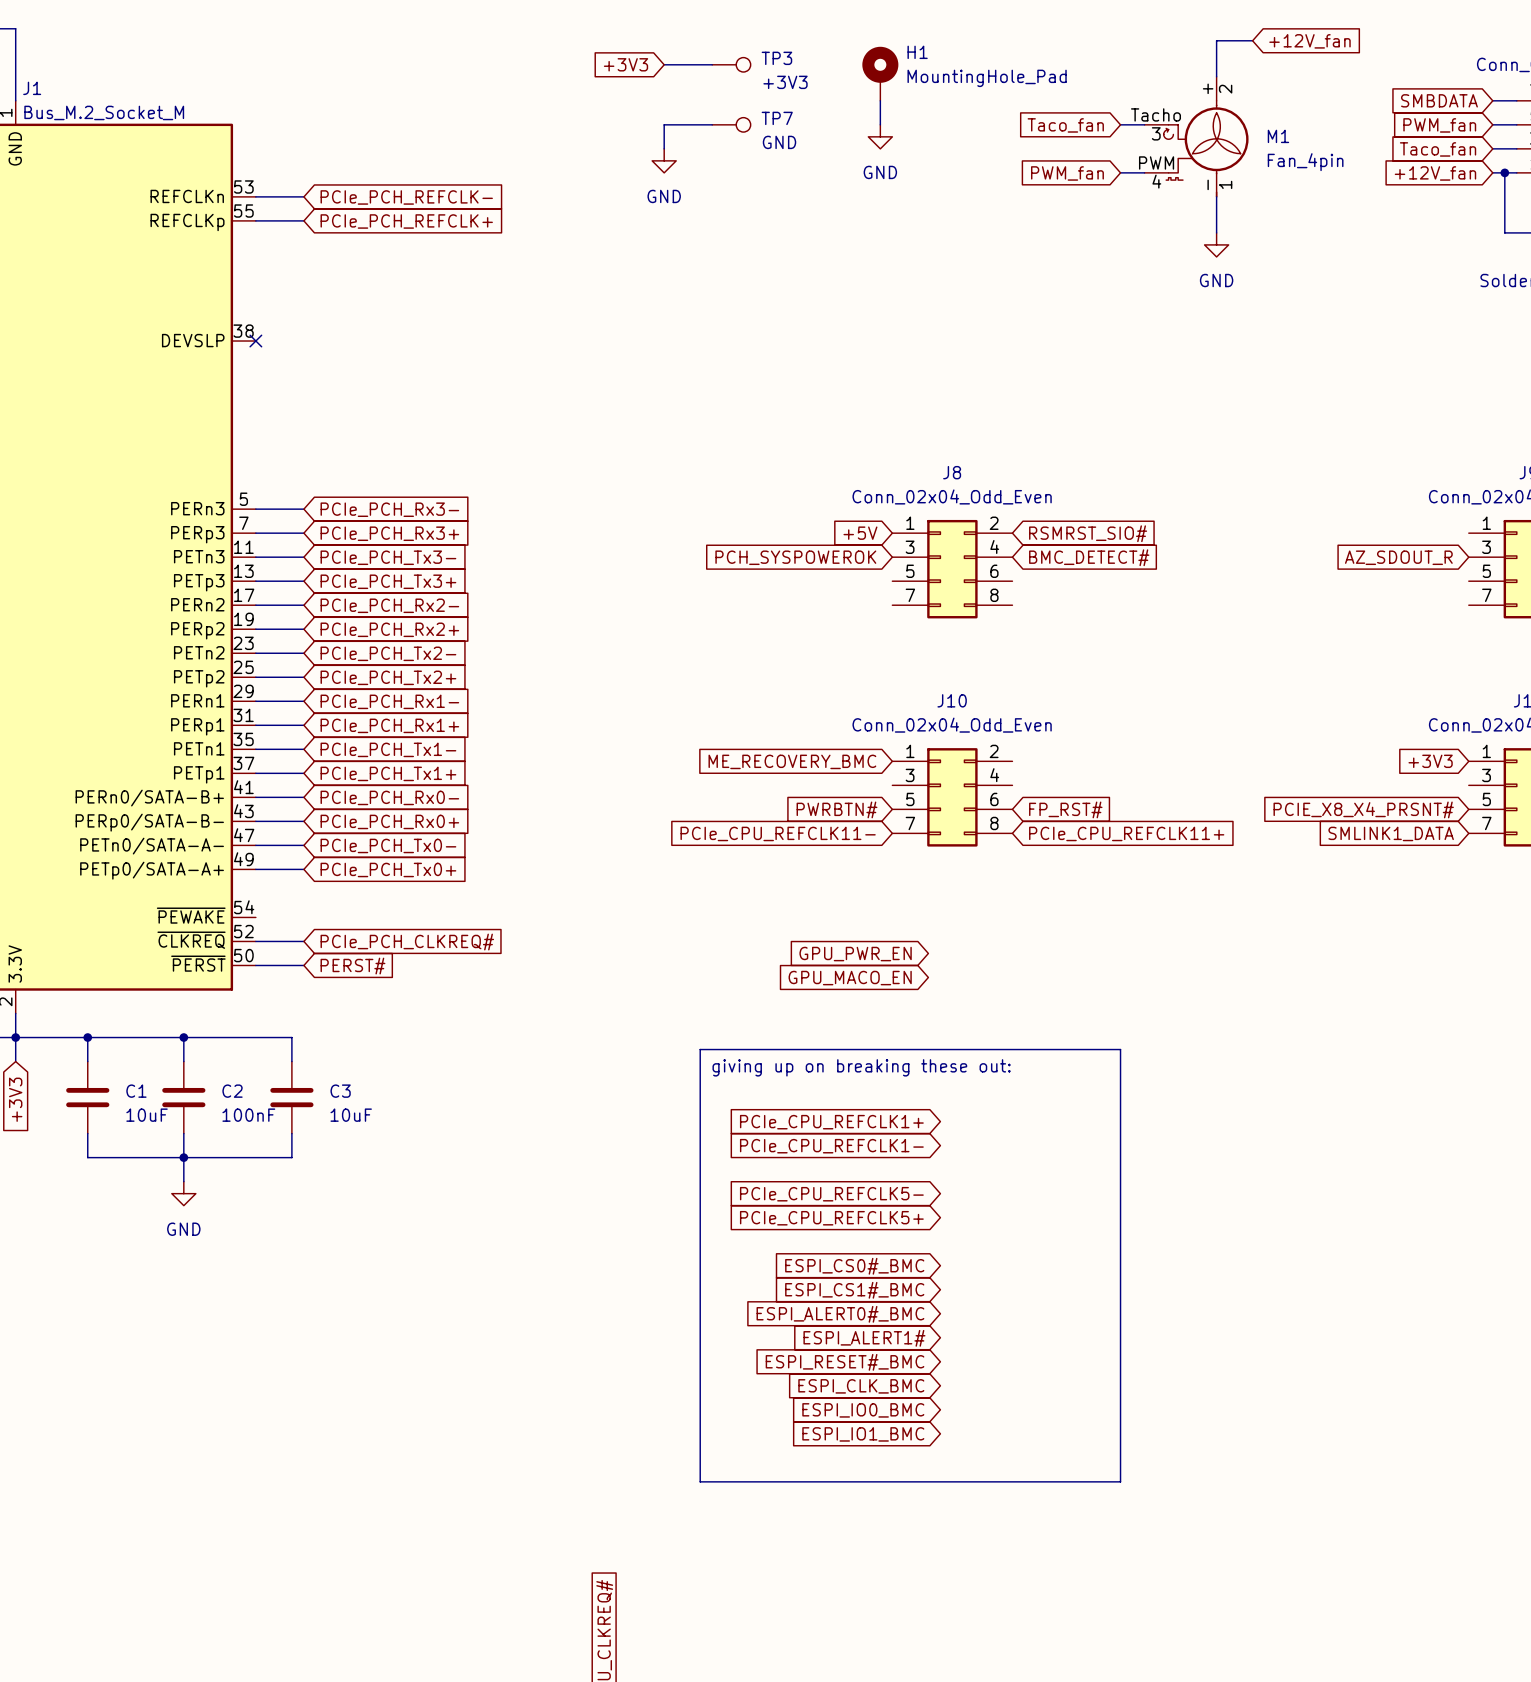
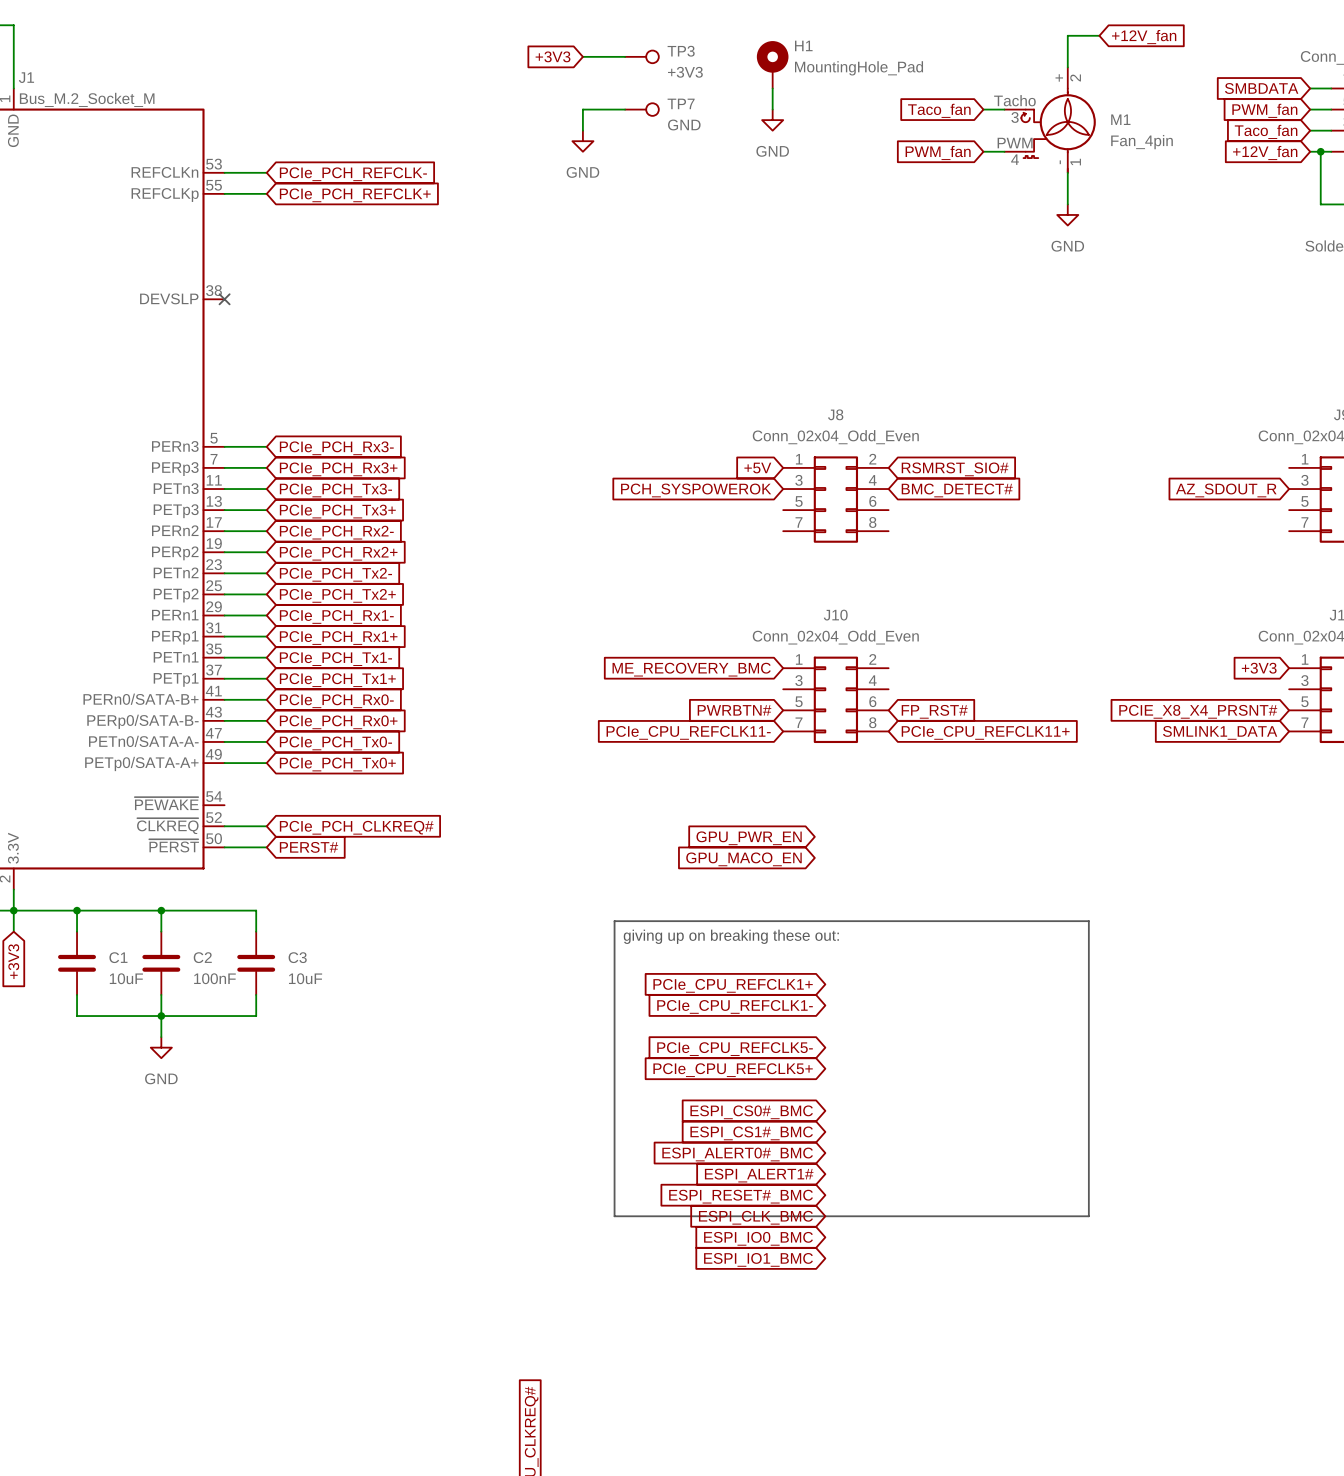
line: (1120, 1049) (1120, 1481) (700, 1481) (700, 1385) -> (983, 921) (1088, 921) (1088, 1216) (614, 1216)

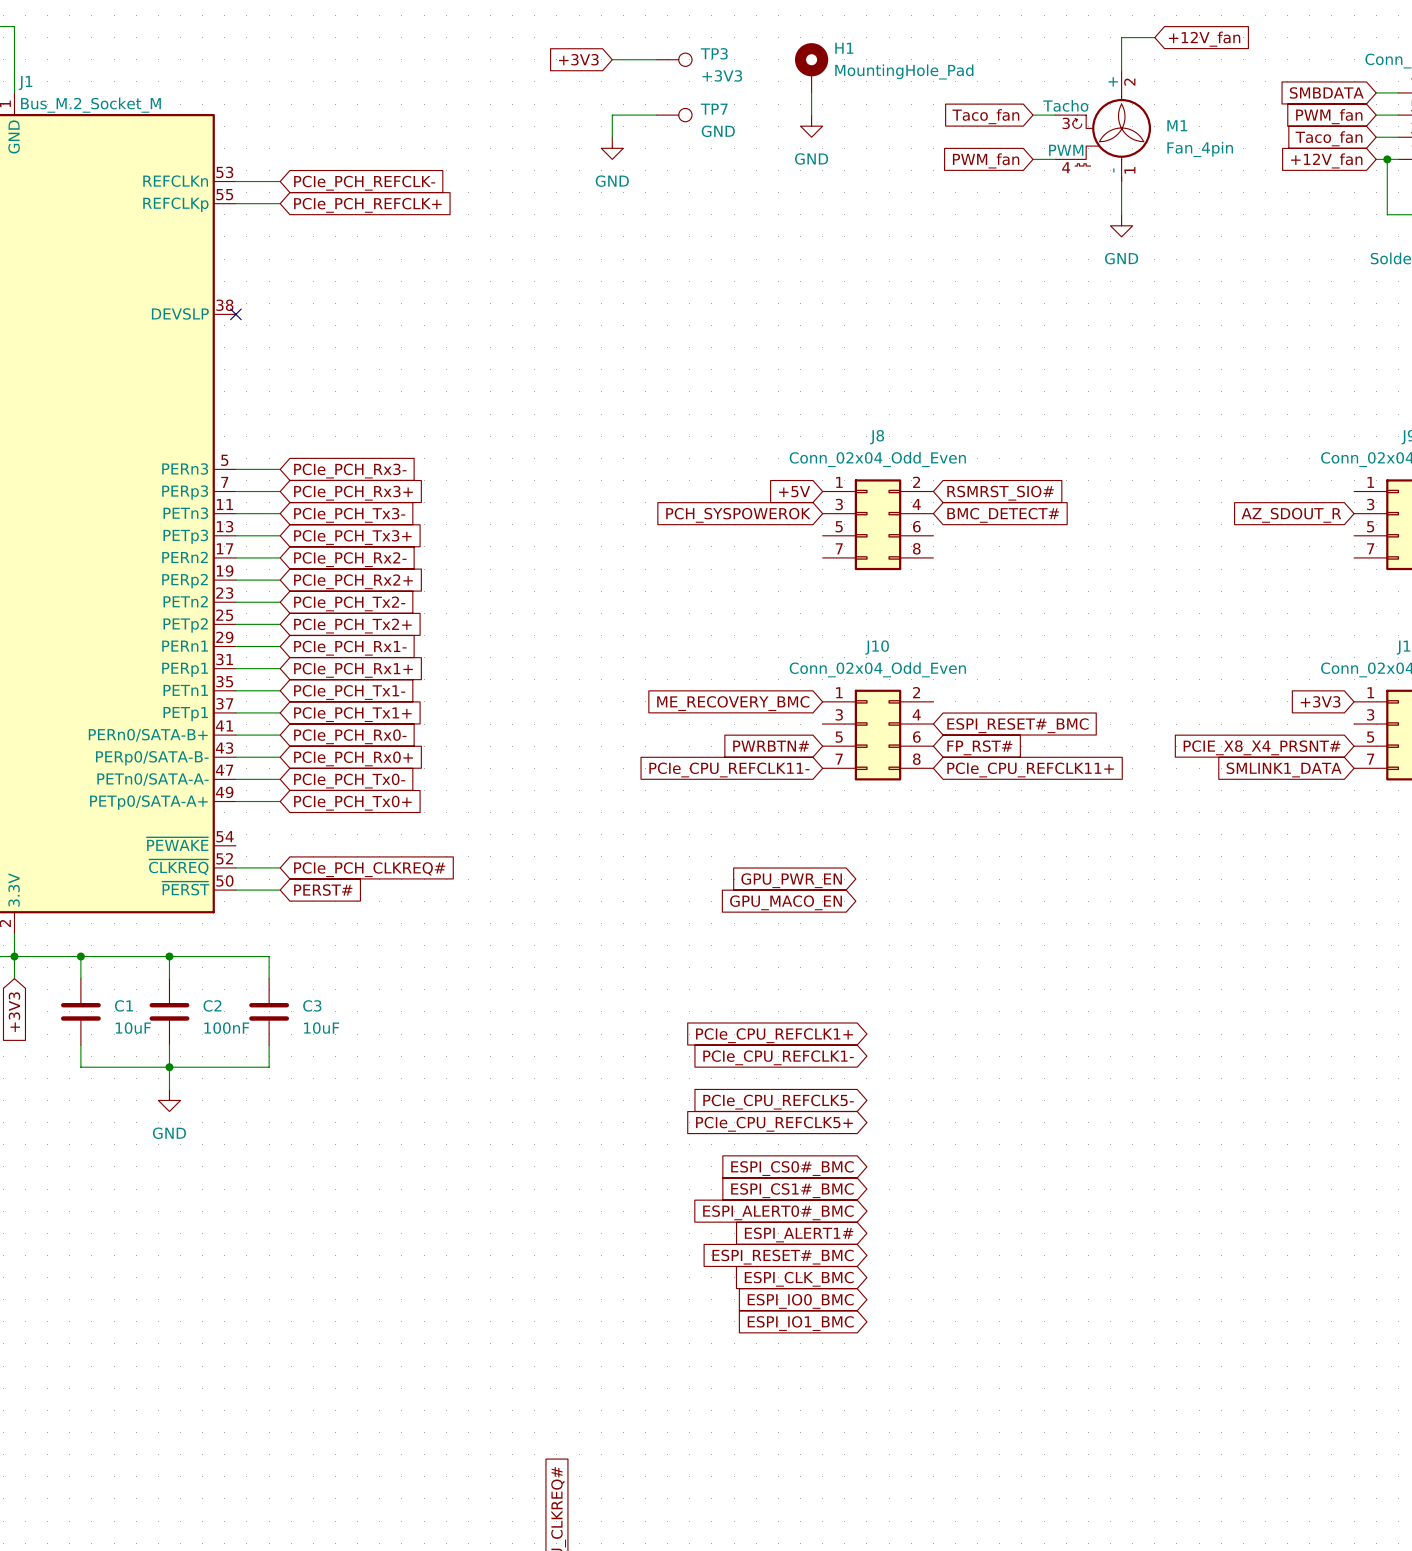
global label: none -> ESPI_RESET#_BMC (1017, 725)
line: (614, 921) (1088, 921) (1088, 1216) (614, 1216) (614, 921) -> none
text: giving up on breaking these out: (731, 936) -> none

